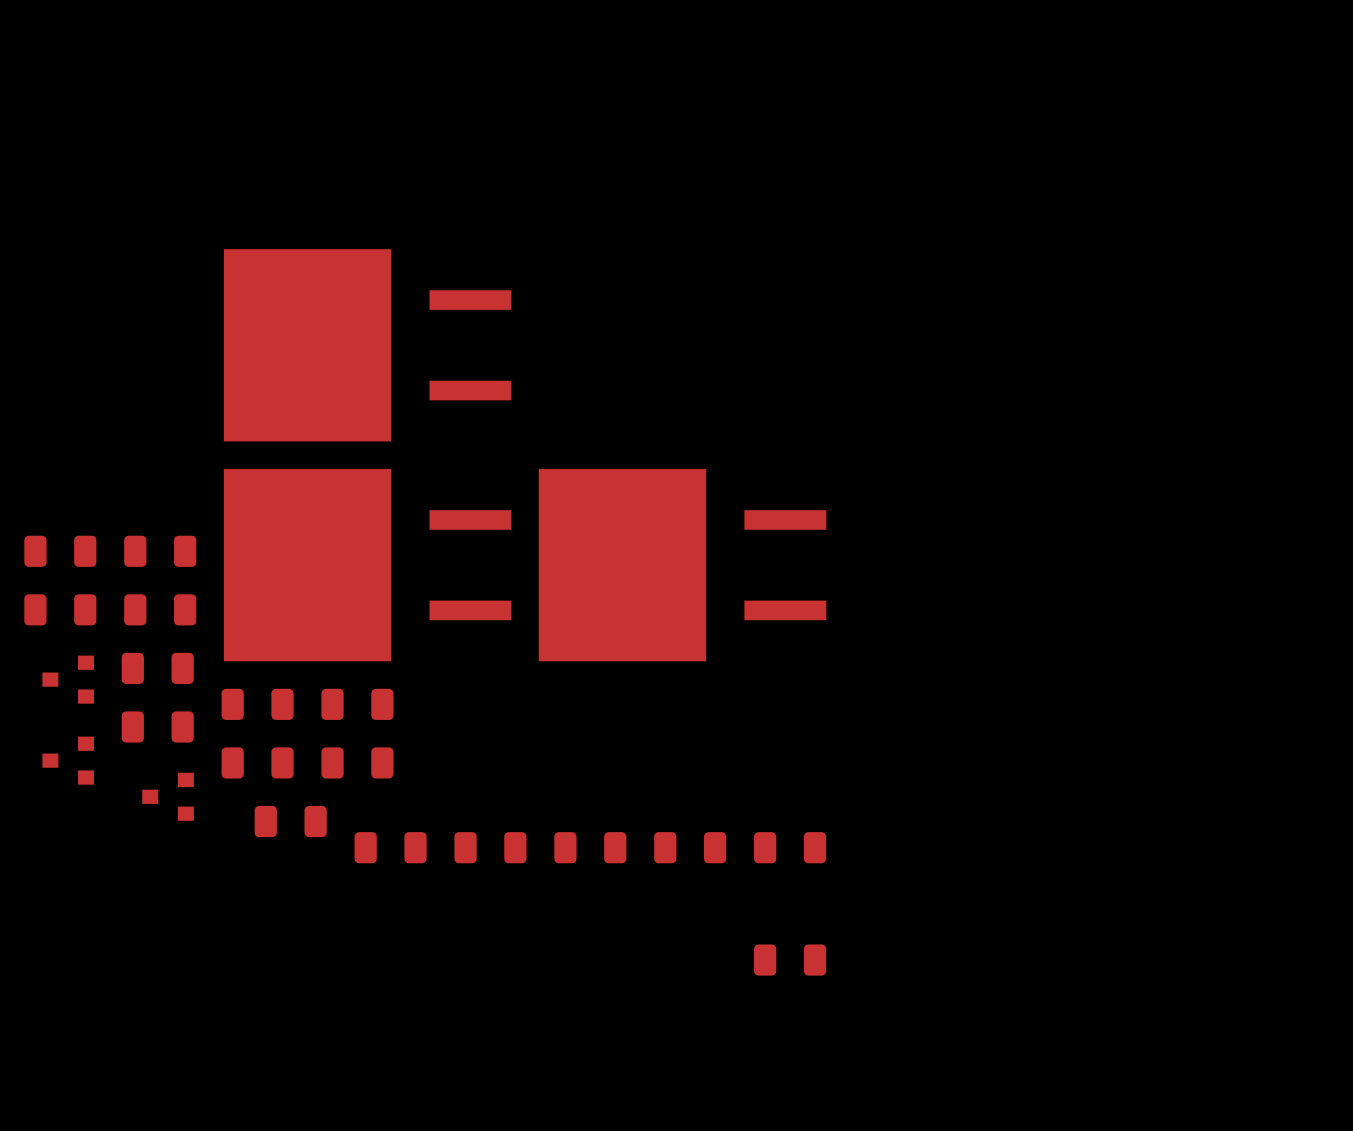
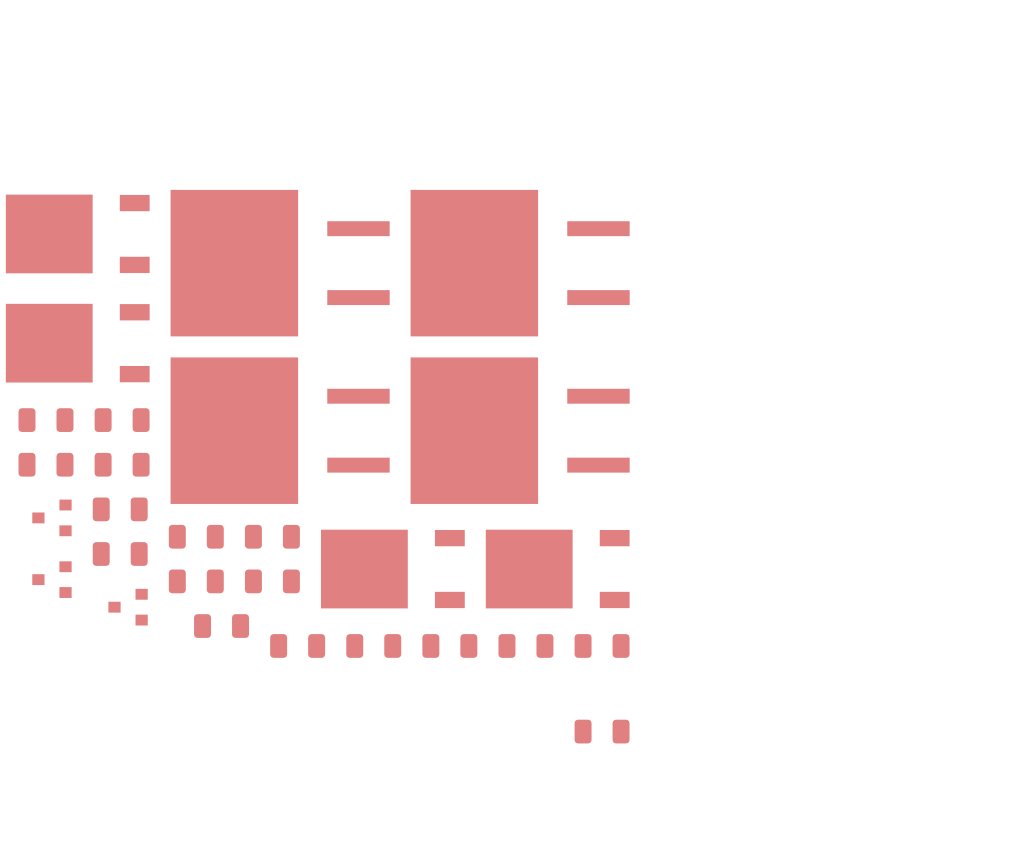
part: none -> (77, 233)
part: none -> (520, 263)
part: none -> (77, 343)
part: none -> (392, 569)
part: none -> (557, 569)

